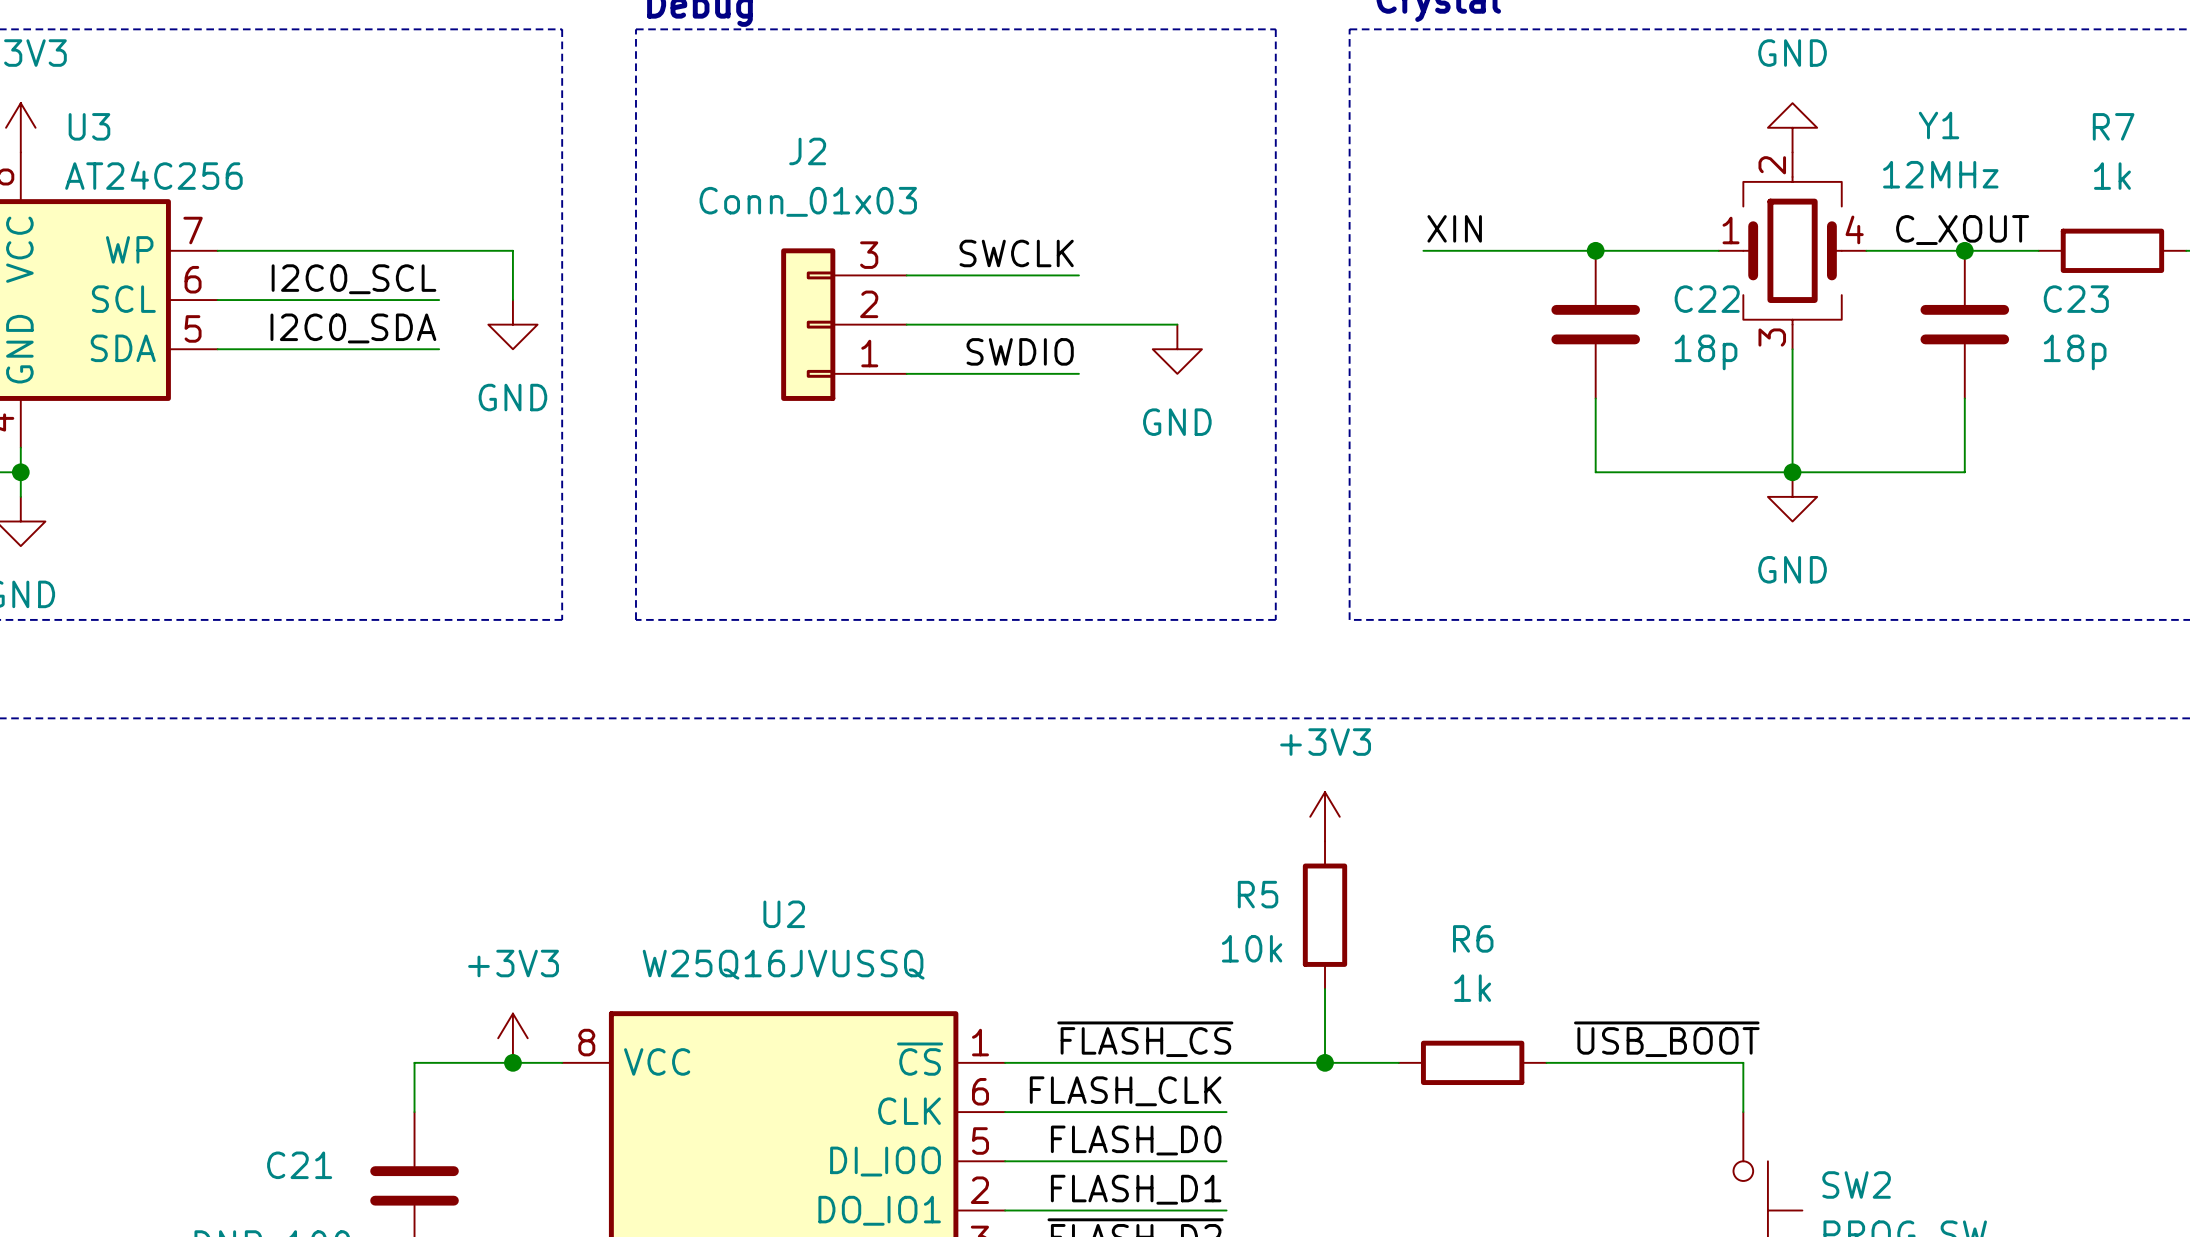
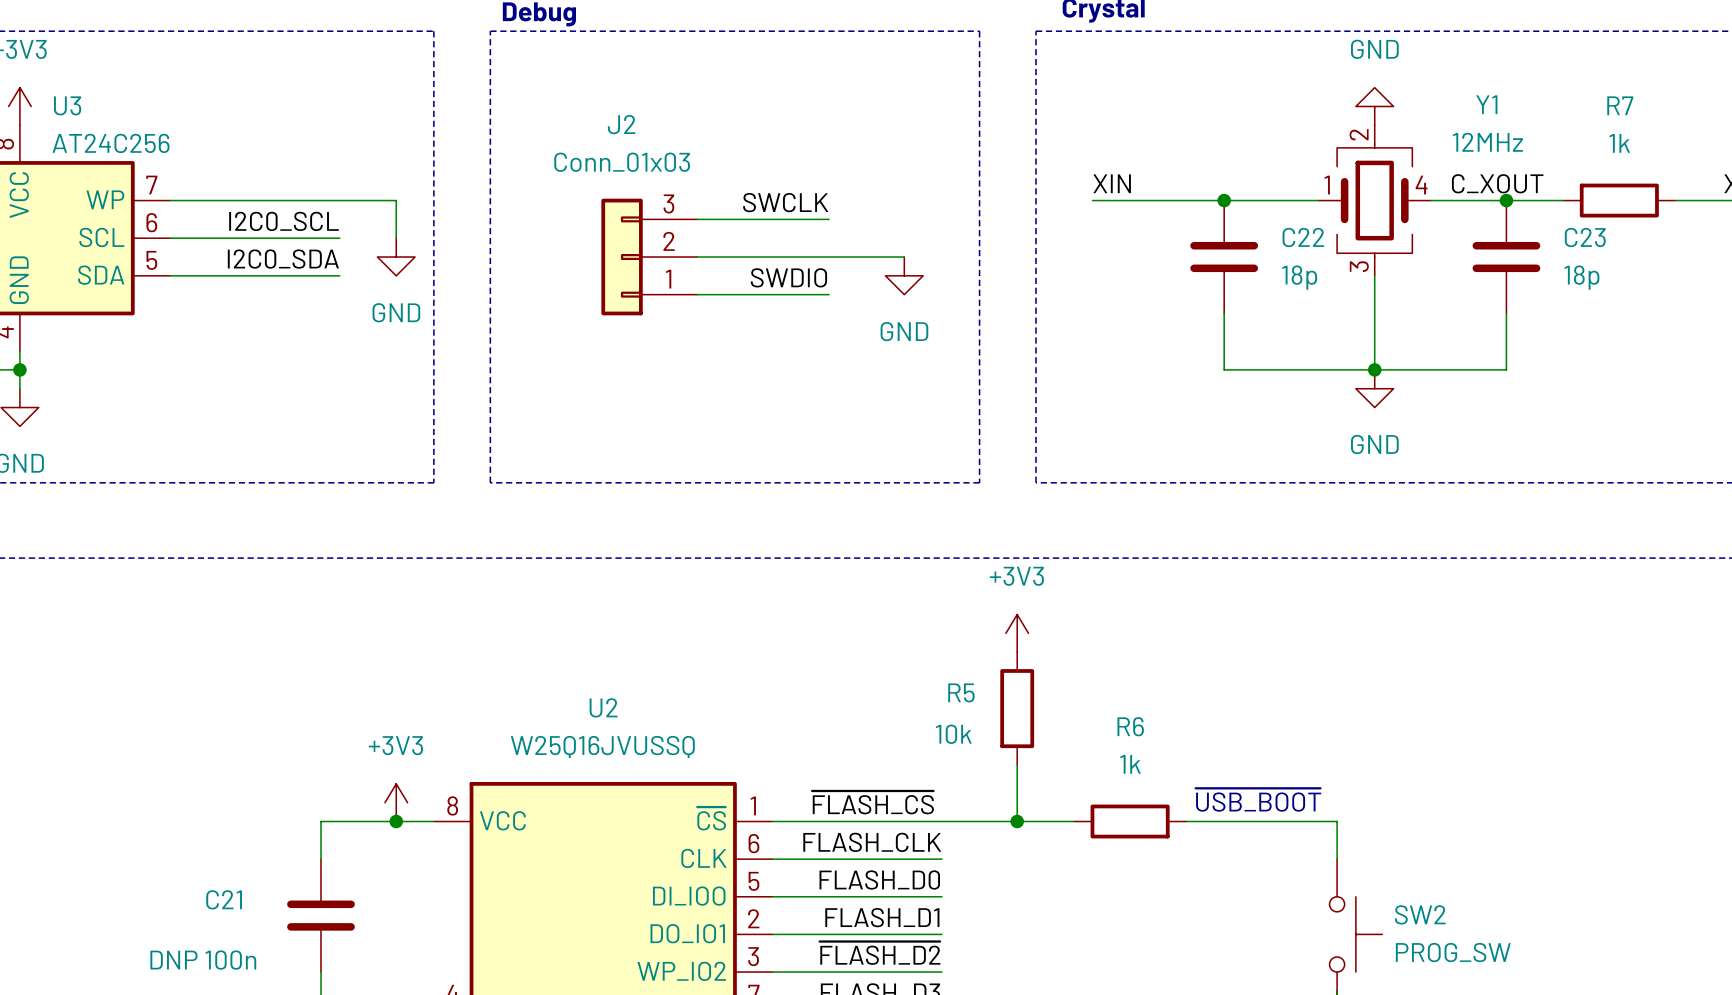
text: none -> ~{USB_BOOT} (1258, 799)
label: ~{USB_BOOT} (1666, 1039) -> none

